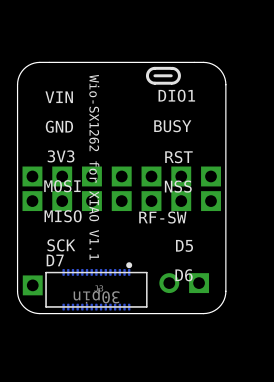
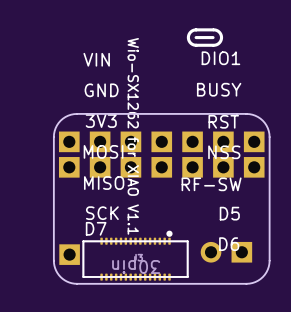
board edge: none -> (246, 113) (77, 113)
board edge: none -> (246, 113) (255, 115) (262, 120) (267, 128) (269, 137)
board edge: (225, 171) (225, 81) (222, 73) (214, 65) (203, 62) (39, 62) (26, 67) (18, 78) (17, 171) -> (76, 113) (68, 115) (60, 120) (55, 128) (53, 137)

